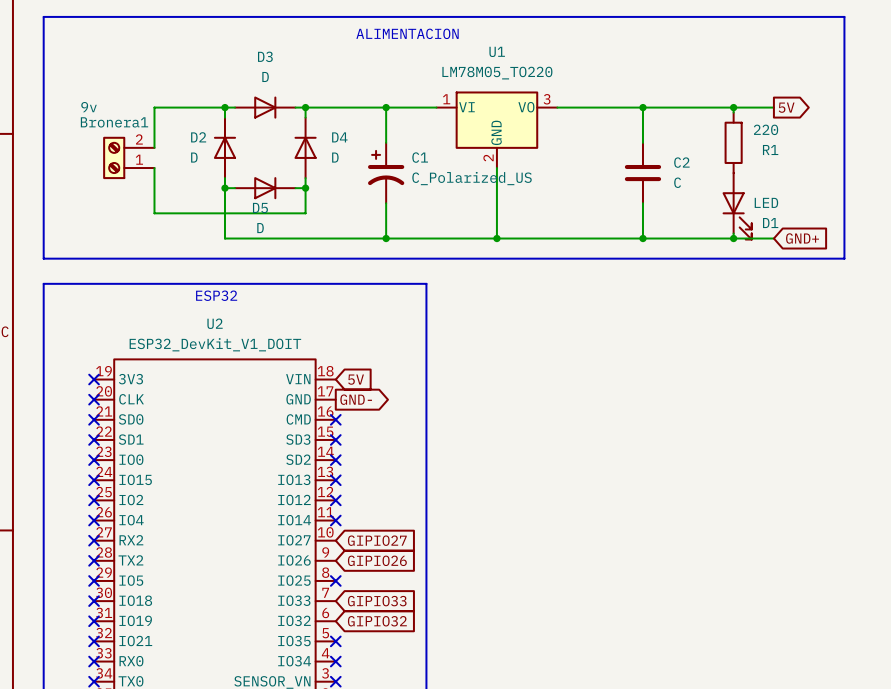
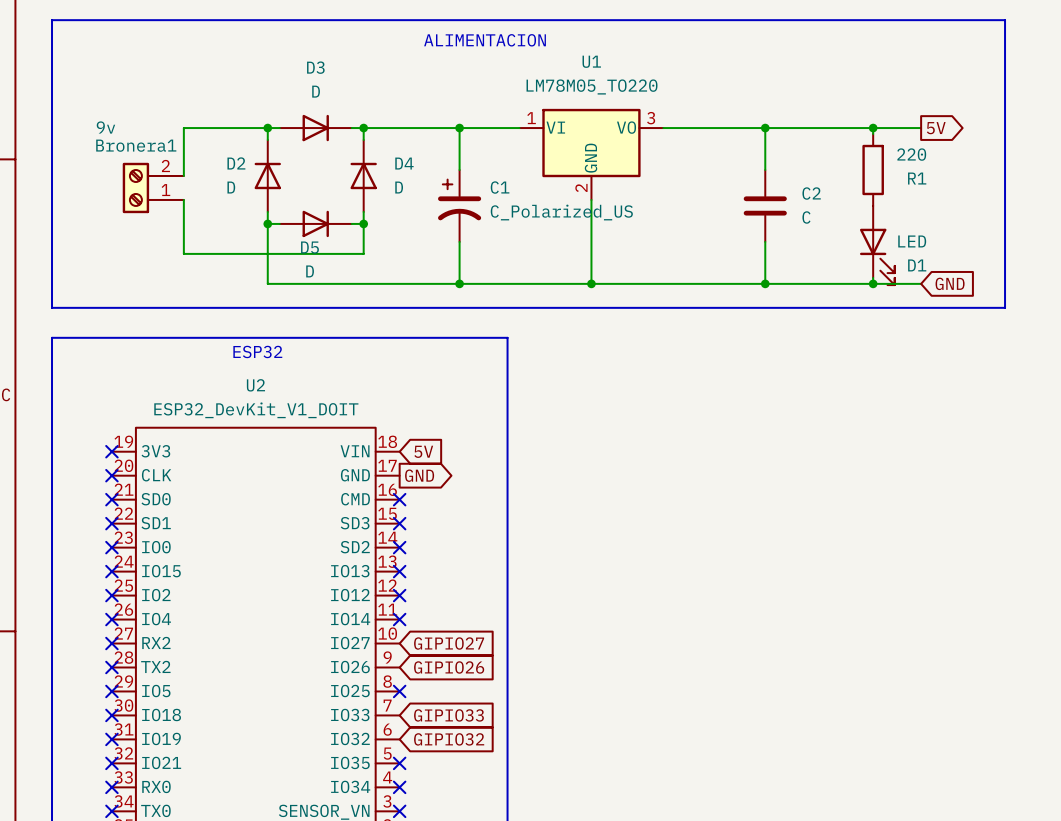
global label: GND+ (802, 238) -> GND (950, 283)
global label: GND- (356, 399) -> GND (419, 475)

